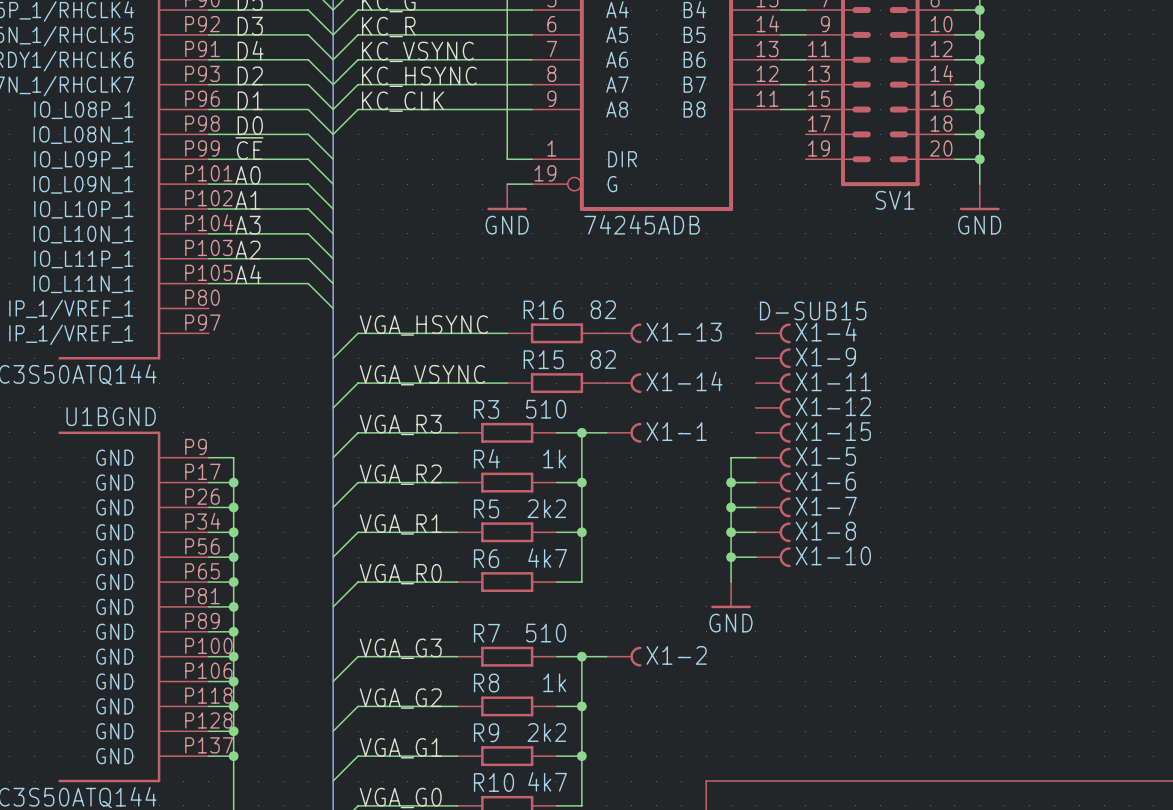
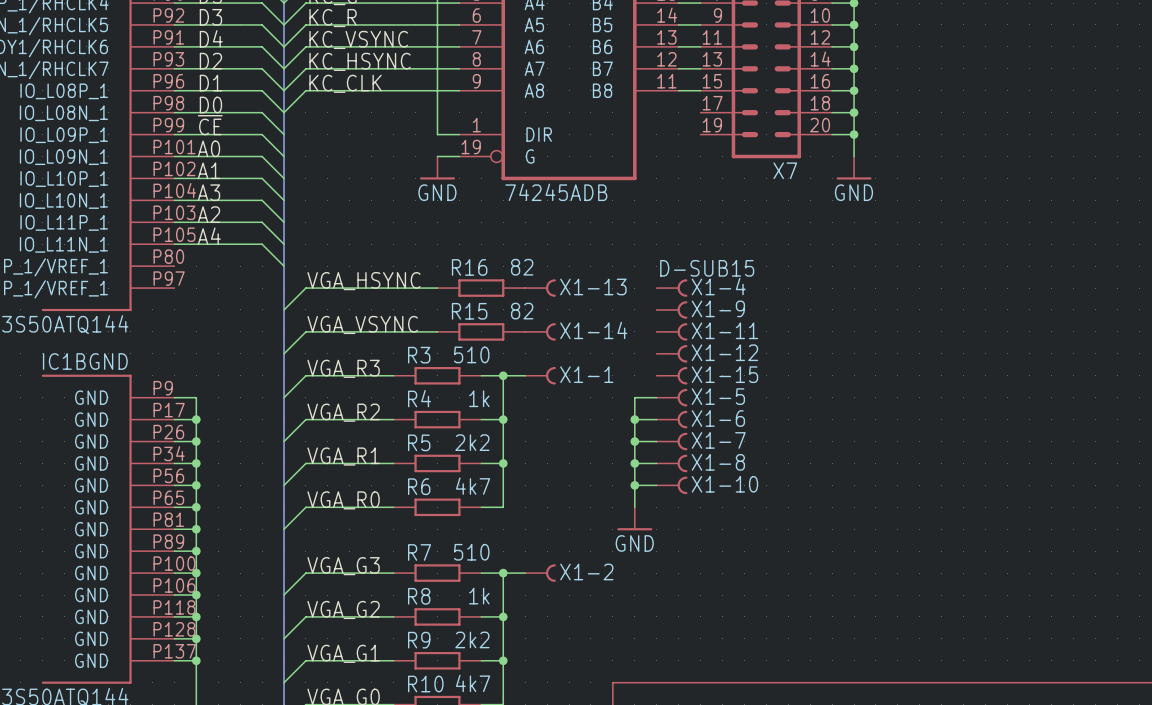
SV1 name: SV1 (895, 200) -> X7 (785, 170)
U1BGND name: U1BGND (111, 416) -> IC1BGND (85, 361)

